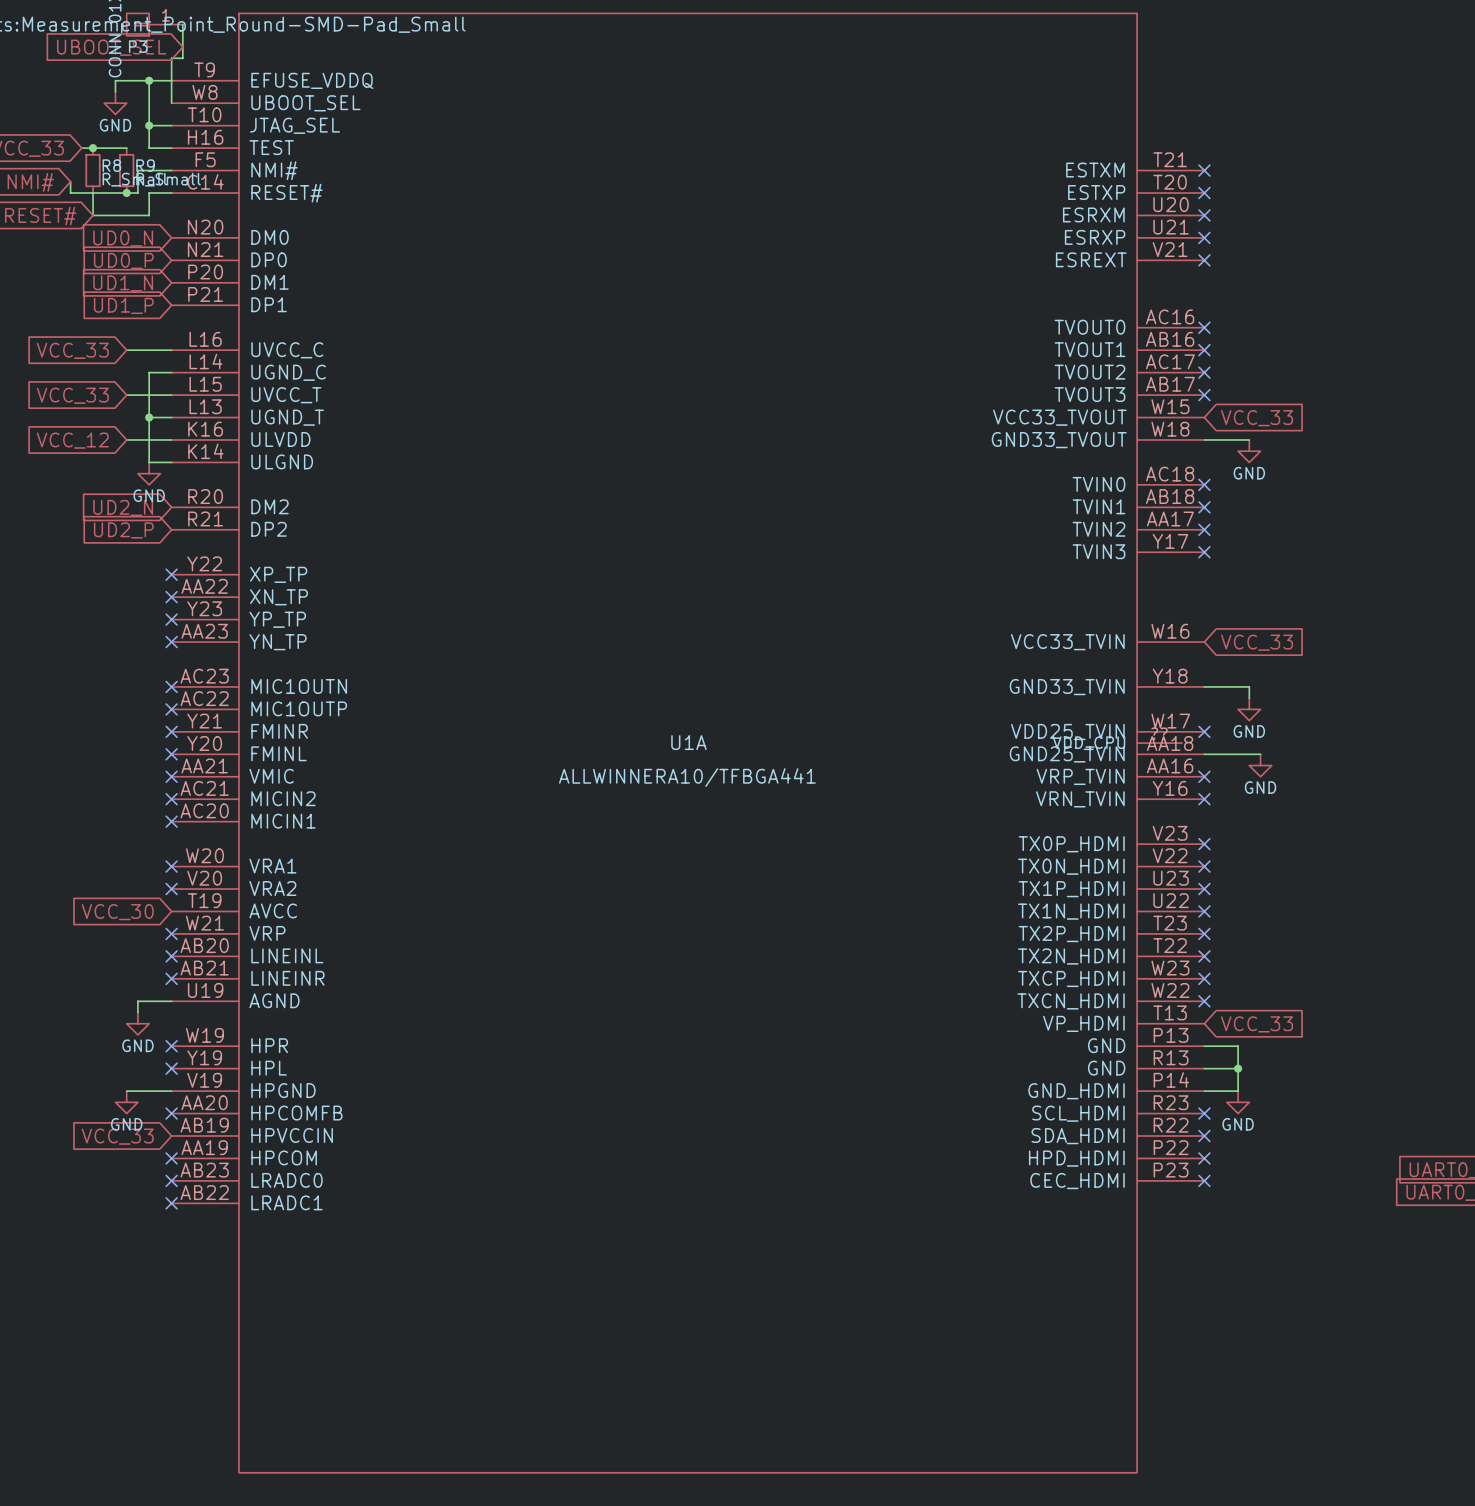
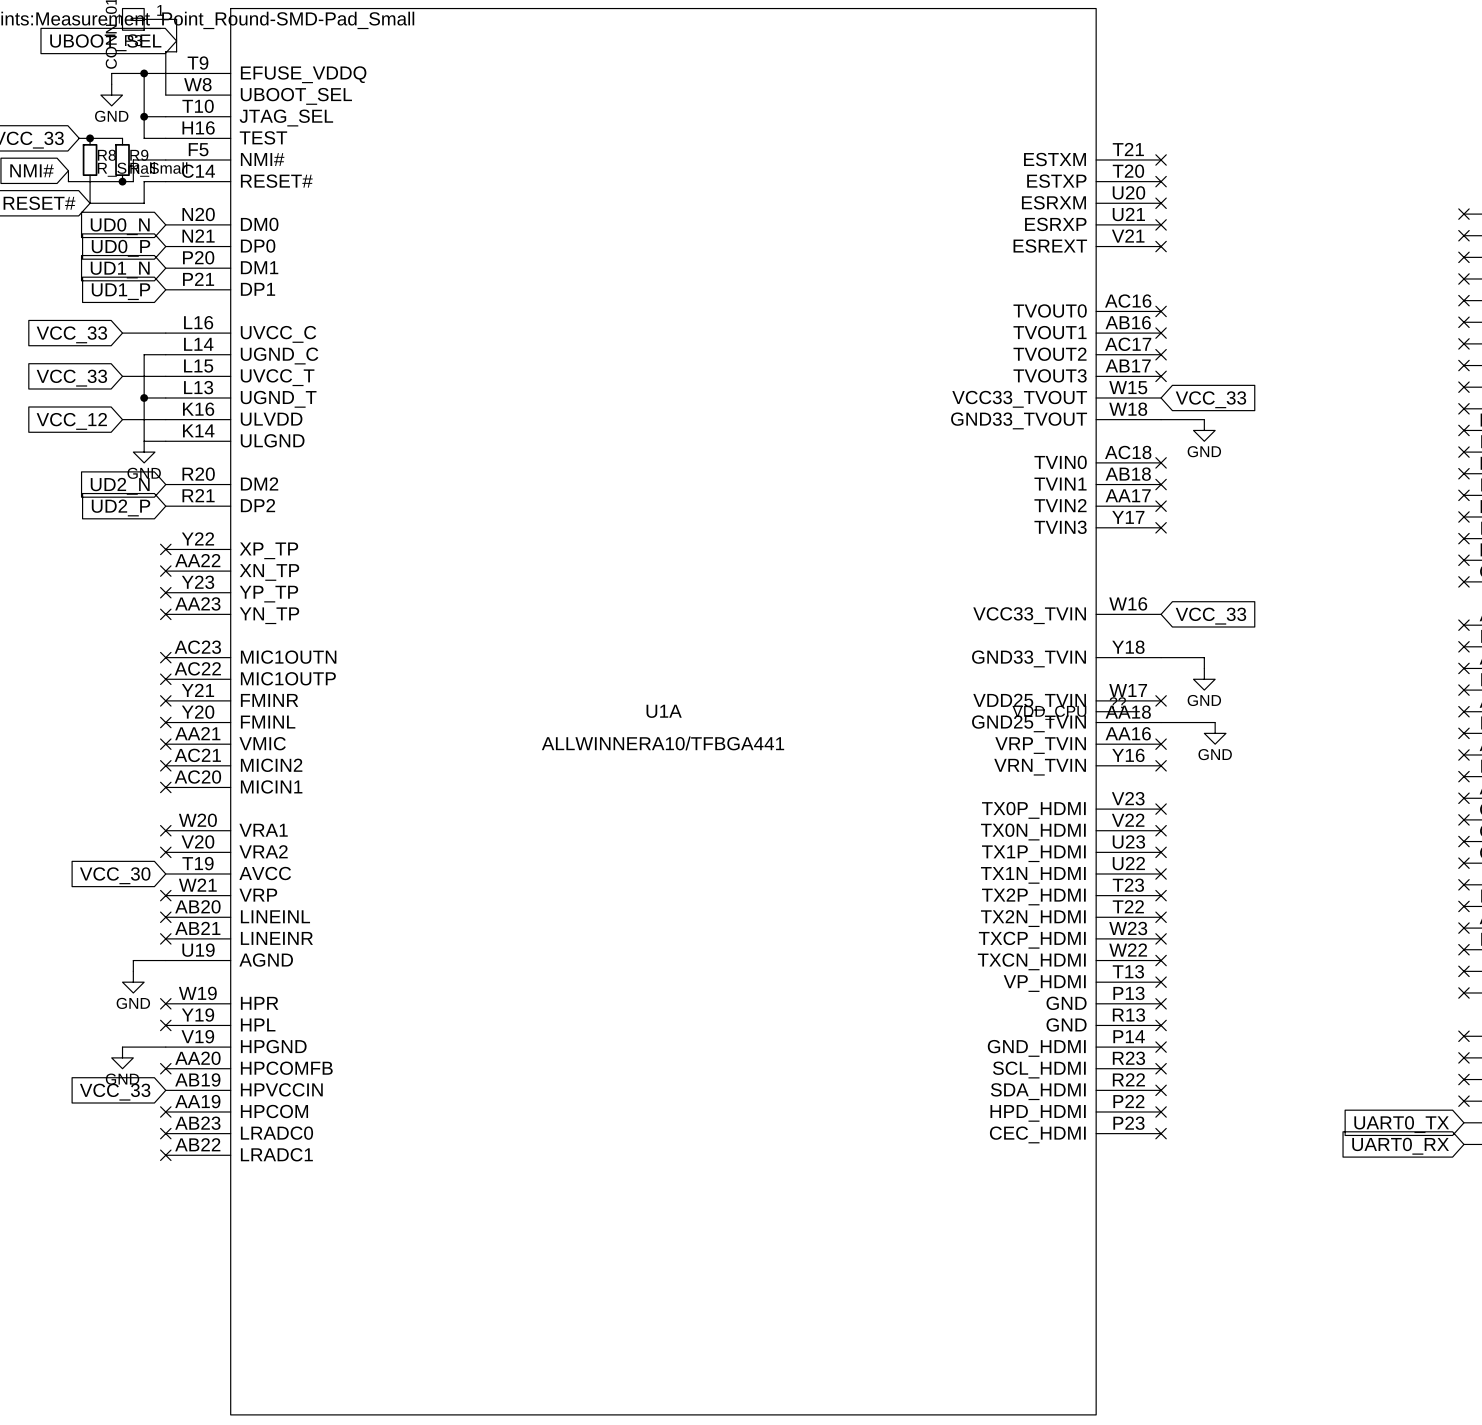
no-connect mark: none -> (1161, 982)
global label: VCC_33 (1257, 1024) -> none
wire: (1204, 1046) (1238, 1046) (1238, 1091) (1204, 1091) -> none
no-connect mark: none -> (1161, 1003)
wire: (1204, 1068) (1238, 1068) -> none
no-connect mark: none -> (1161, 1025)
junction: (1238, 1068) -> none
no-connect mark: none -> (1161, 1047)
power symbol: GND (1238, 1102) -> none

